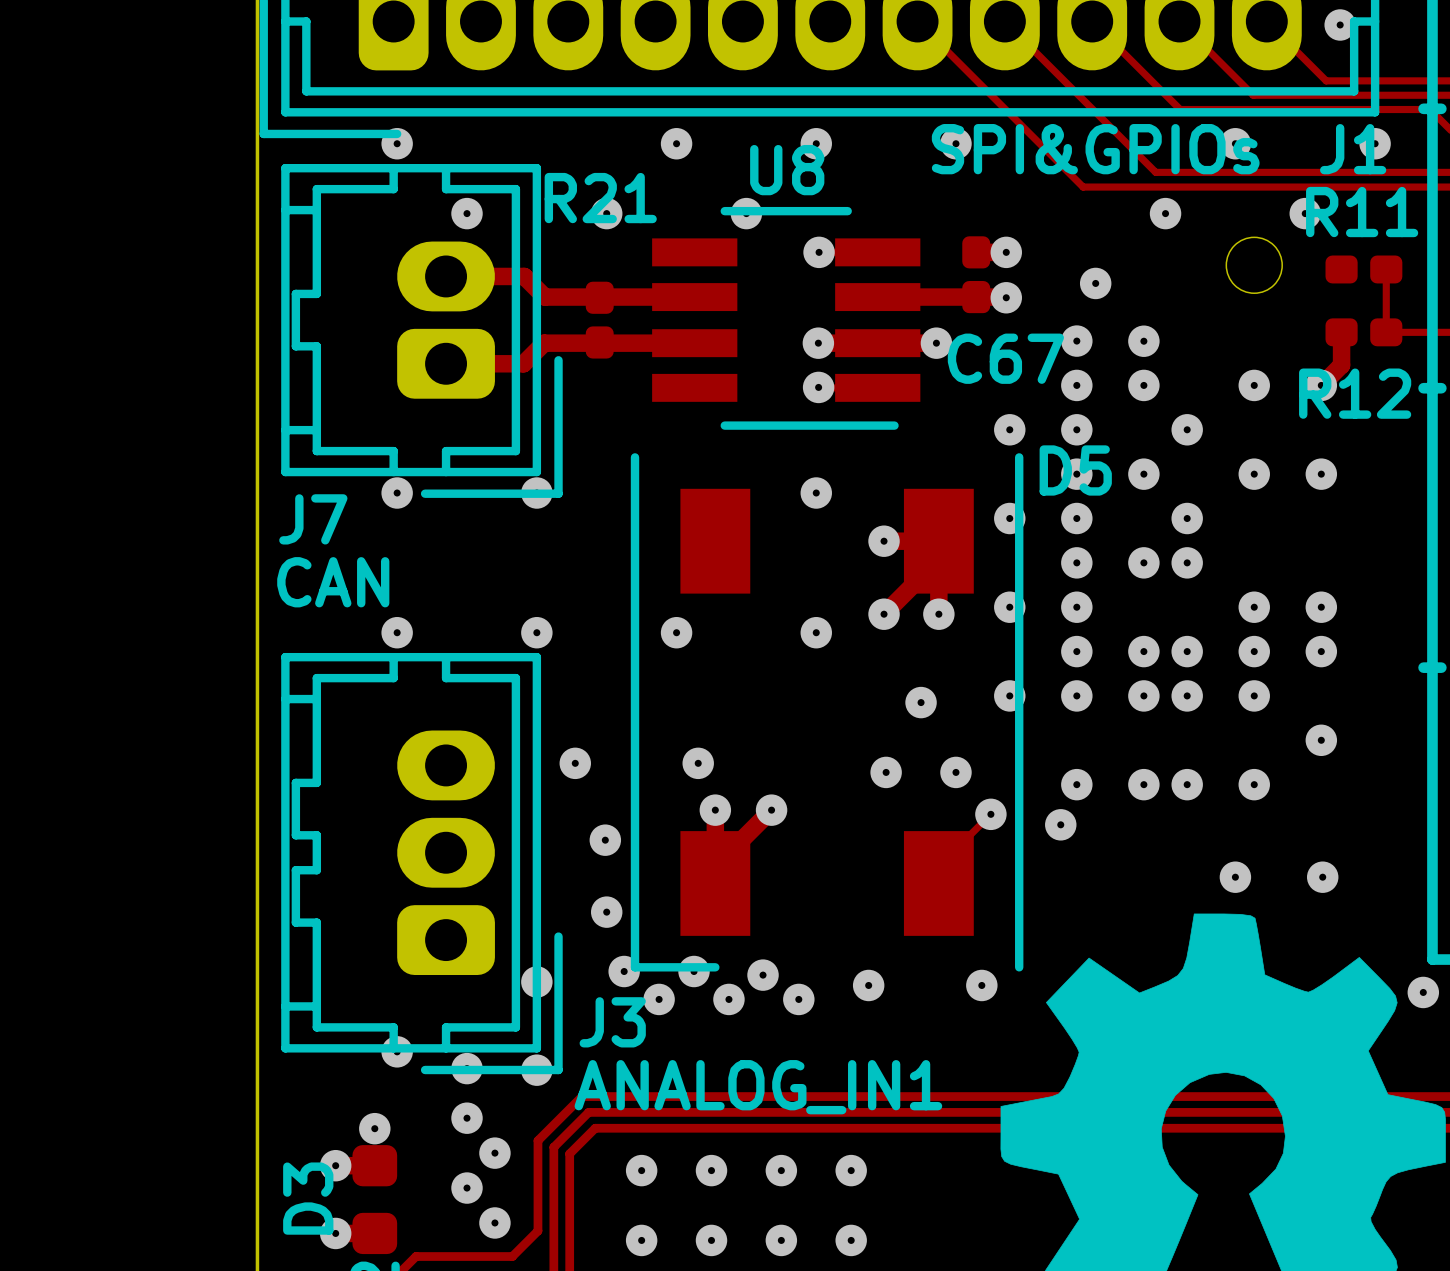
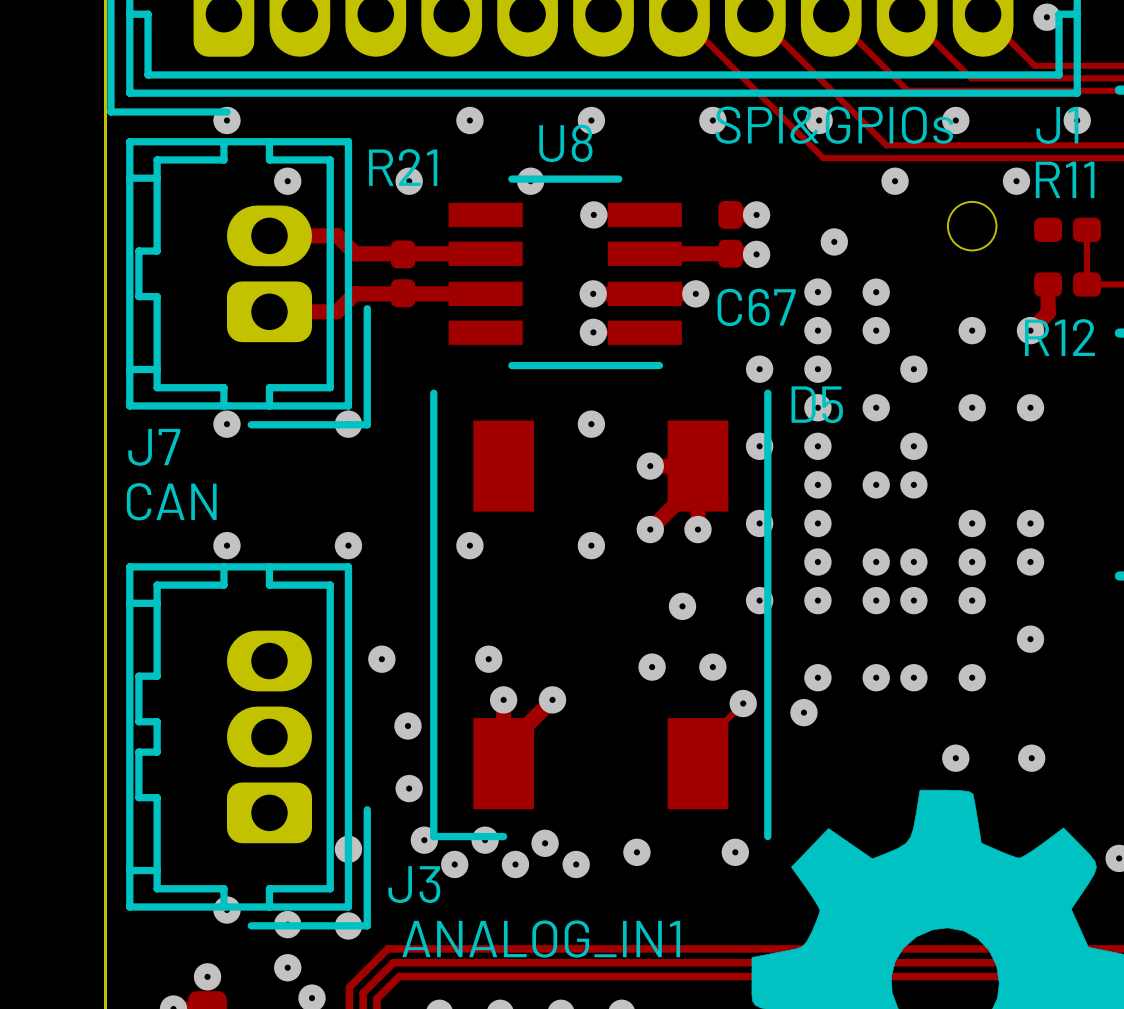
via: none -> (819, 120)

